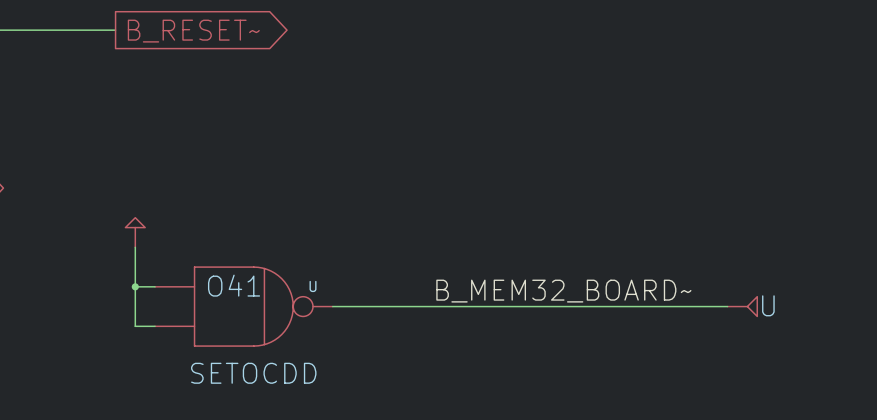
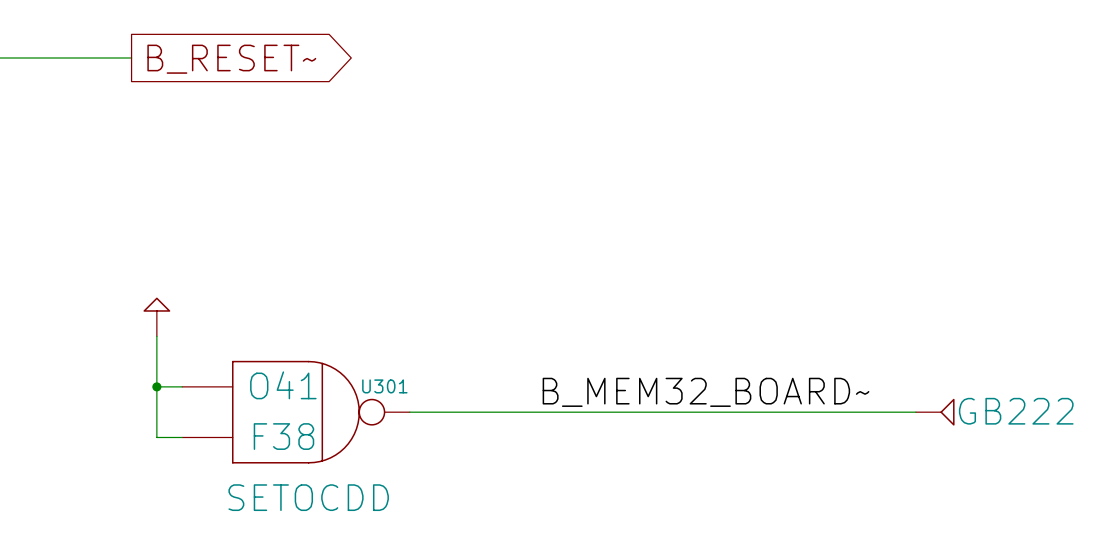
U name: U (313, 286) -> U301 (384, 386)
U name: U (768, 305) -> GB222 (1016, 411)
U value: none -> F38 (283, 436)

